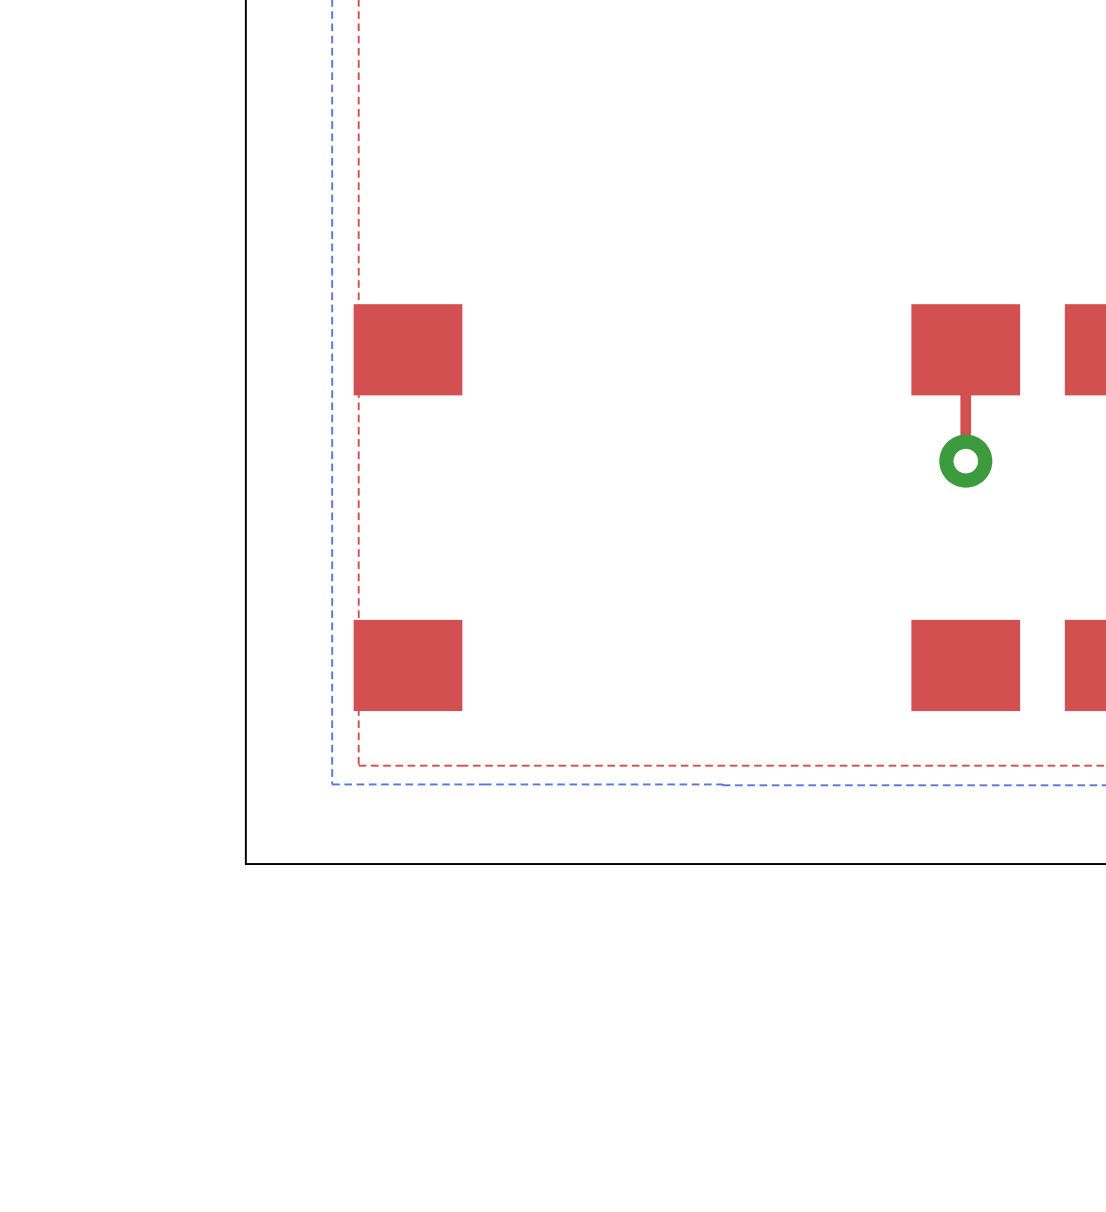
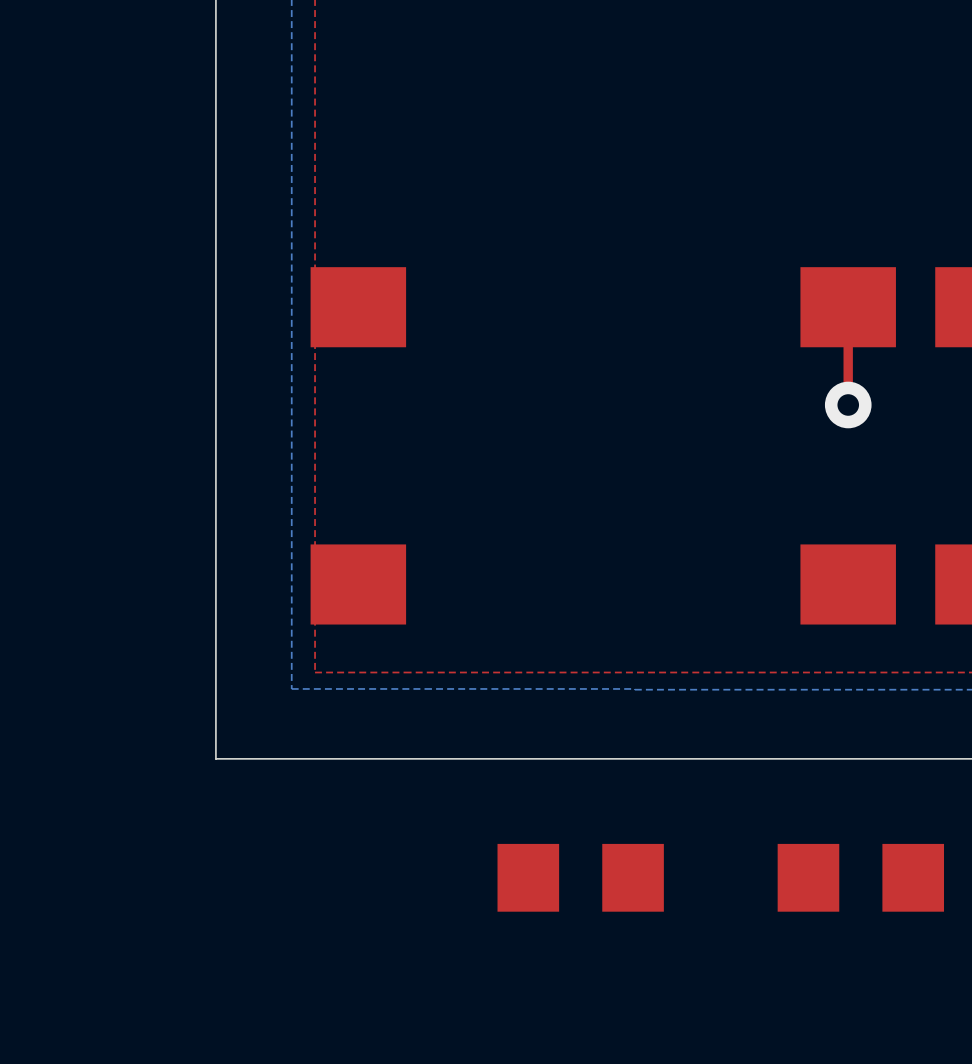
part: none -> (580, 877)
part: none -> (860, 877)

